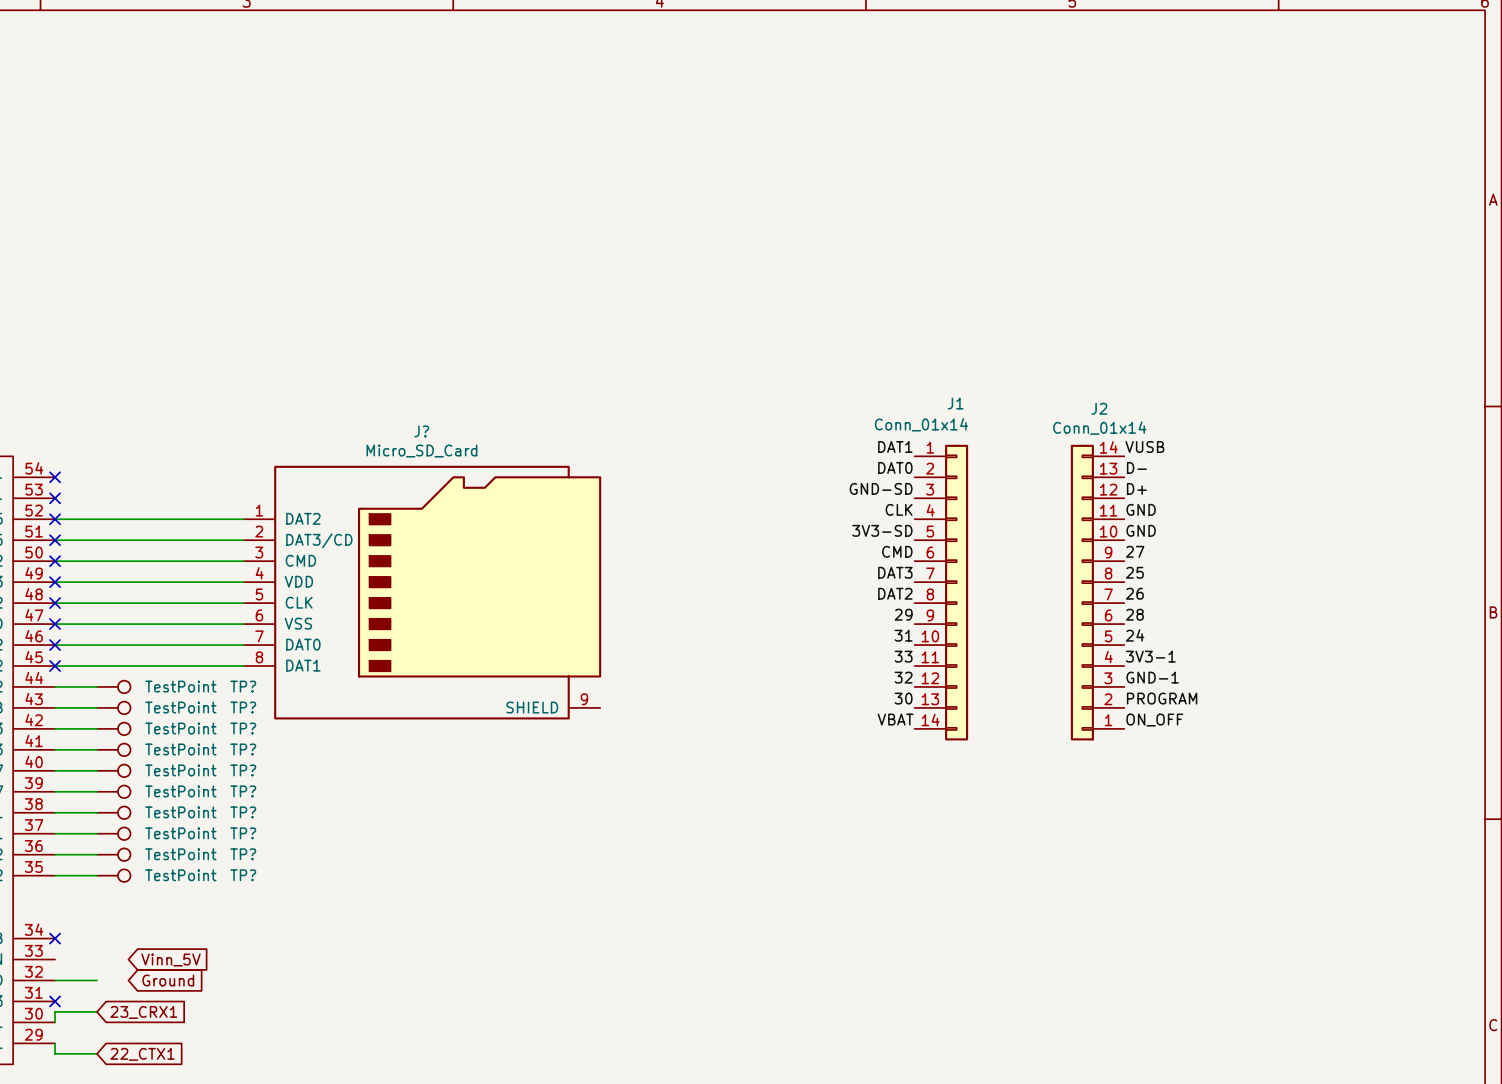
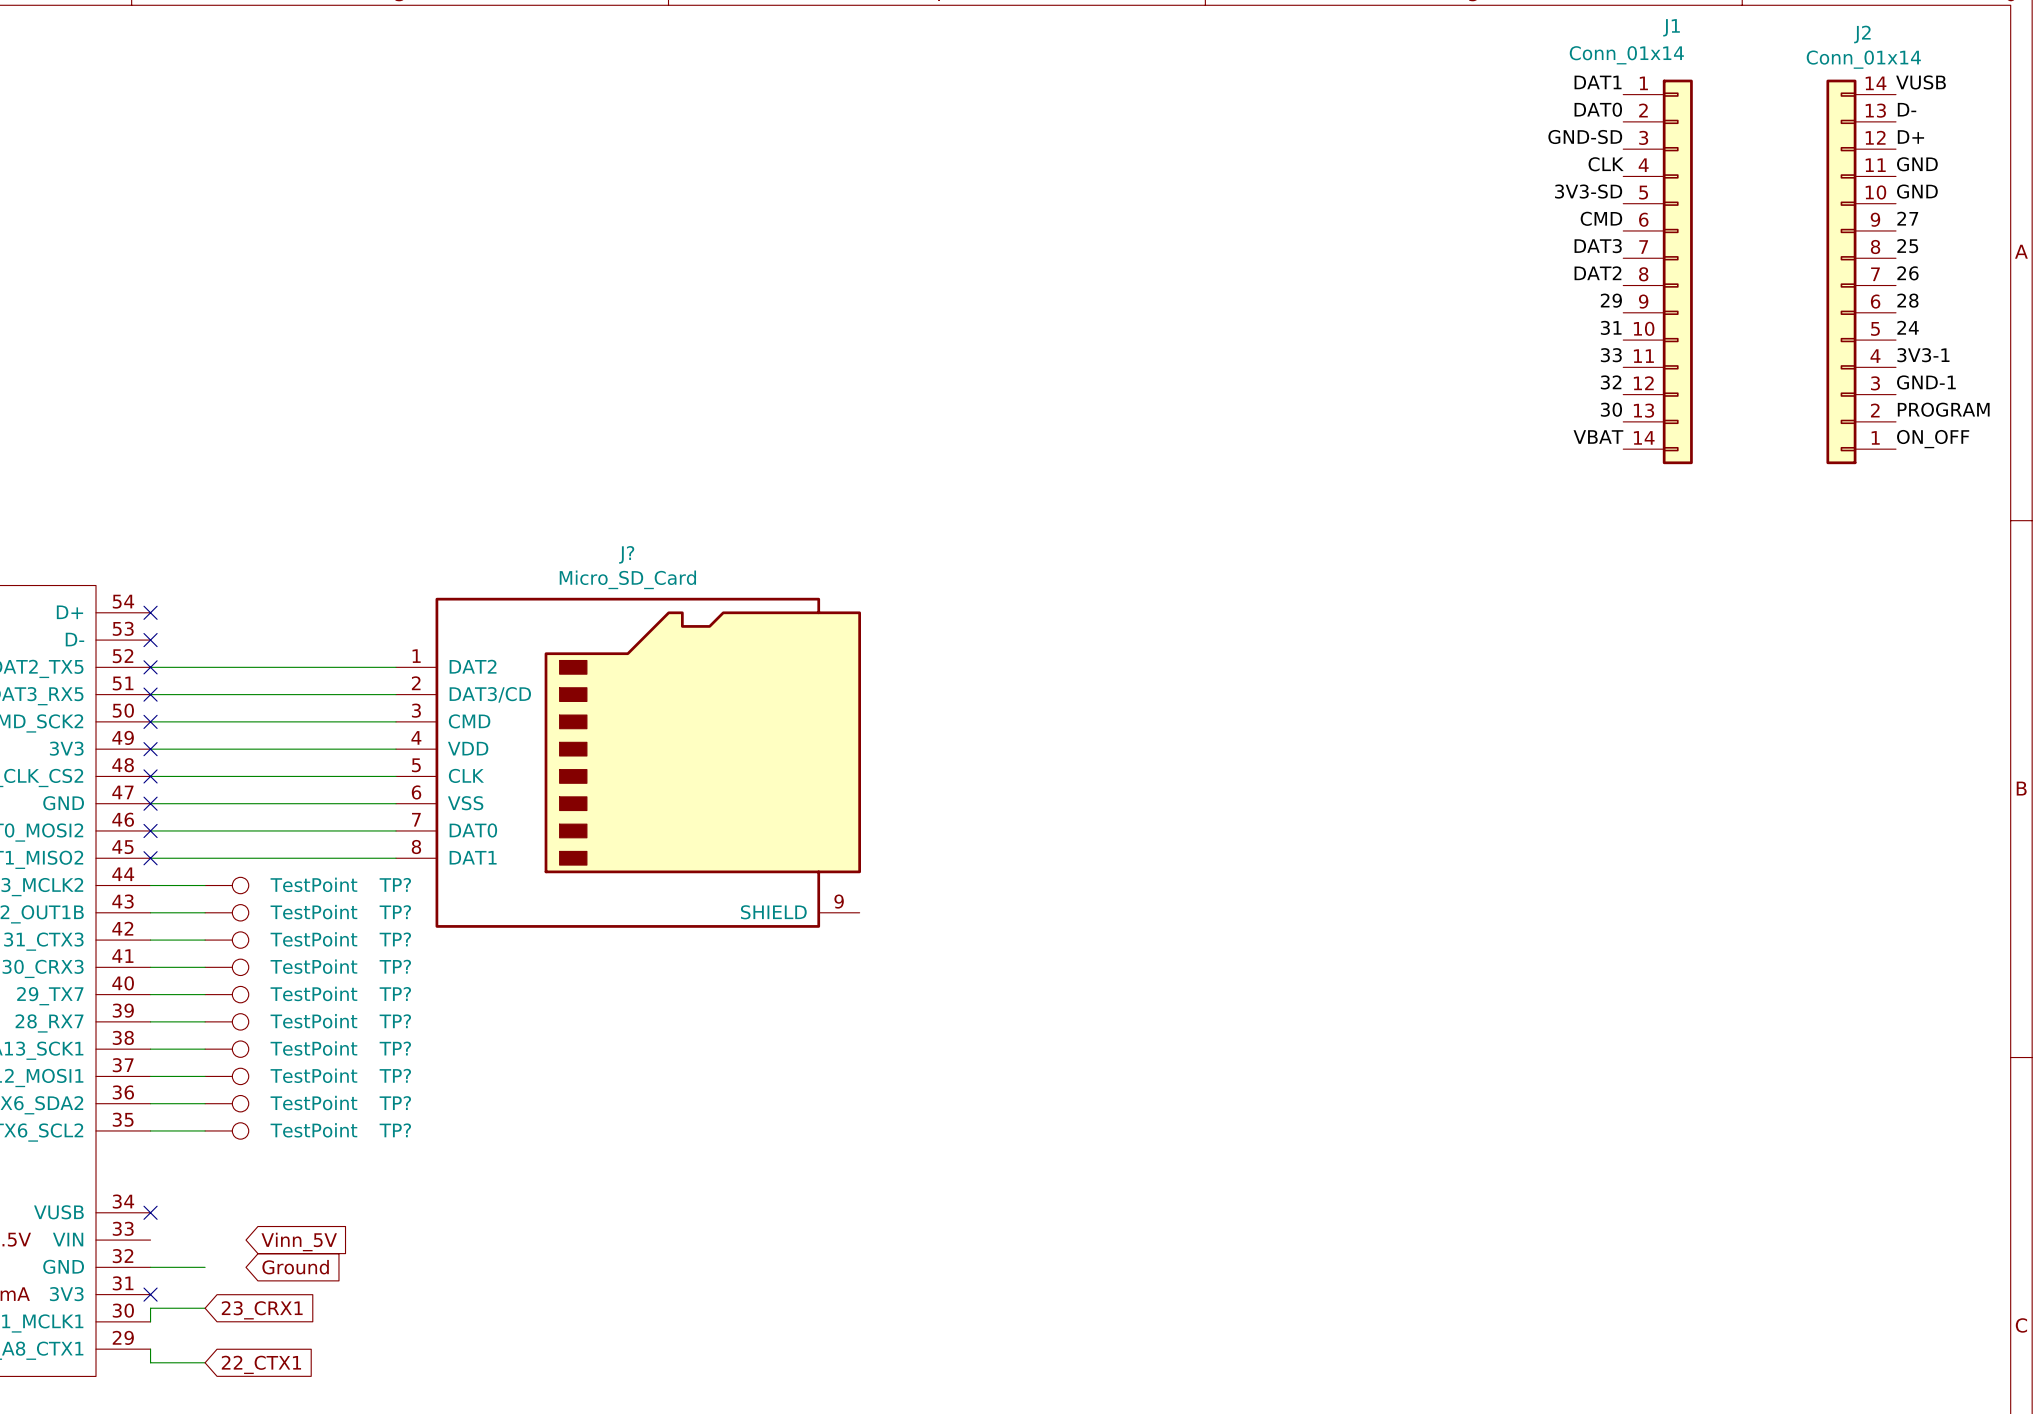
label: none -> DAT1 (1598, 82)
label: none -> VUSB (1920, 82)
label: none -> DAT0 (1598, 109)
label: none -> D- (1907, 109)
label: none -> GND-SD (1585, 137)
label: none -> D+ (1910, 136)
label: none -> CLK (1606, 164)
label: none -> GND (1917, 164)
label: none -> 3V3-SD (1588, 191)
label: none -> GND (1917, 191)
label: none -> CMD (1601, 218)
label: none -> 27 (1907, 218)
label: none -> DAT3 (1598, 246)
label: none -> 25 (1907, 246)
label: none -> DAT2 (1597, 273)
label: none -> 26 (1907, 273)
label: none -> 29 (1611, 300)
label: none -> 28 (1907, 300)
label: none -> 31 (1611, 327)
label: none -> 24 (1908, 327)
label: none -> 33 (1611, 355)
label: none -> 3V3-1 (1923, 355)
label: none -> 32 (1611, 382)
label: none -> GND-1 (1926, 382)
label: none -> 30 (1611, 409)
label: none -> PROGRAM (1943, 409)
label: none -> VBAT (1598, 436)
label: none -> ON_OFF (1933, 439)
label: DAT1 (895, 446) -> none
label: VUSB (1144, 446) -> none
label: DAT0 (895, 467) -> none
label: D- (1136, 467) -> none
label: GND-SD (881, 488) -> none
label: D+ (1136, 488) -> none
label: CLK (899, 509) -> none
label: GND (1141, 509) -> none
label: 3V3-SD (882, 530) -> none
label: GND (1141, 530) -> none
label: CMD (897, 551) -> none
label: 27 (1135, 551) -> none
label: DAT3 (895, 572) -> none
label: 25 (1134, 572) -> none
J1 position: (941, 592) -> (1658, 271)
J2 position: (1097, 592) -> (1861, 271)
label: DAT2 (895, 593) -> none
label: 26 (1134, 593) -> none
label: 29 (903, 614) -> none
label: 28 (1134, 614) -> none
label: 31 (903, 635) -> none
label: 24 (1135, 635) -> none
label: 33 (903, 656) -> none
label: 3V3-1 (1150, 656) -> none
label: 32 (903, 677) -> none
label: GND-1 (1152, 677) -> none
label: 30 (903, 698) -> none
label: PROGRAM (1162, 698) -> none
label: VBAT (895, 719) -> none
label: ON_OFF (1154, 720) -> none

